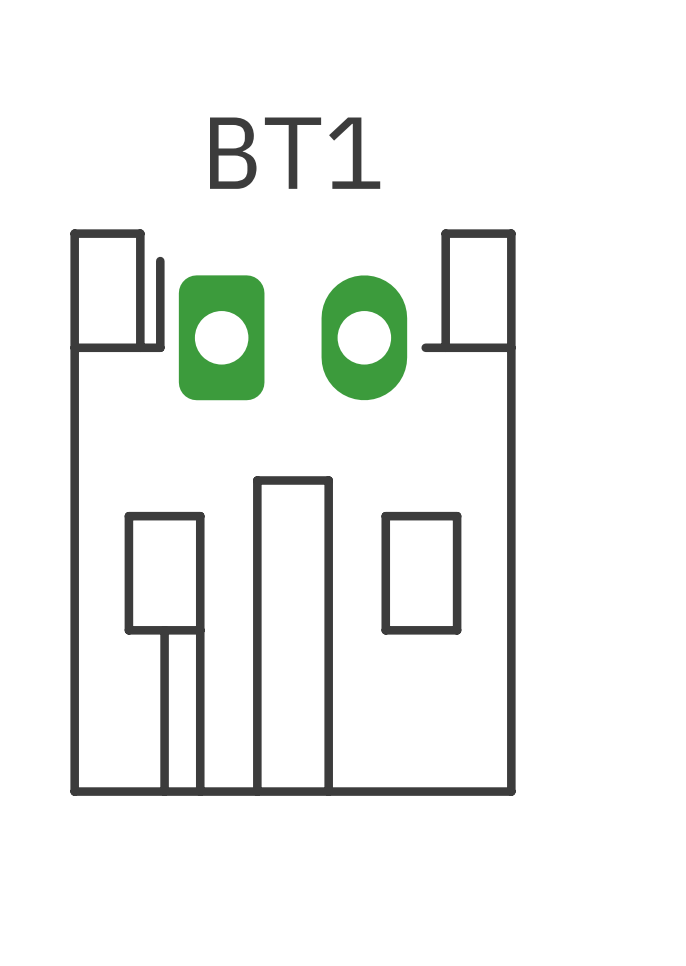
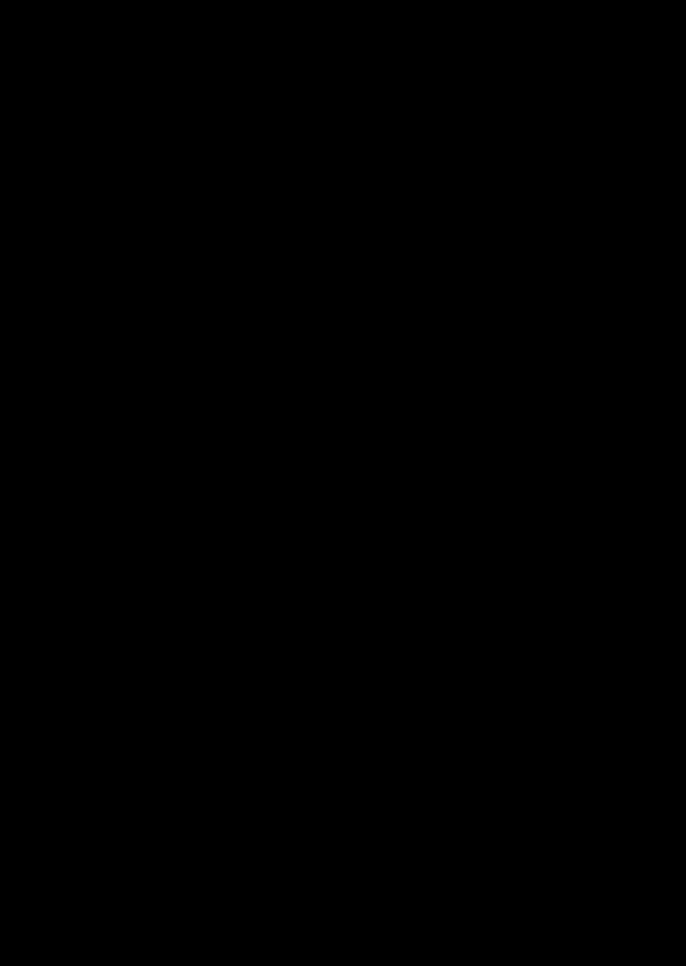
BT1: (293, 512) -> none

